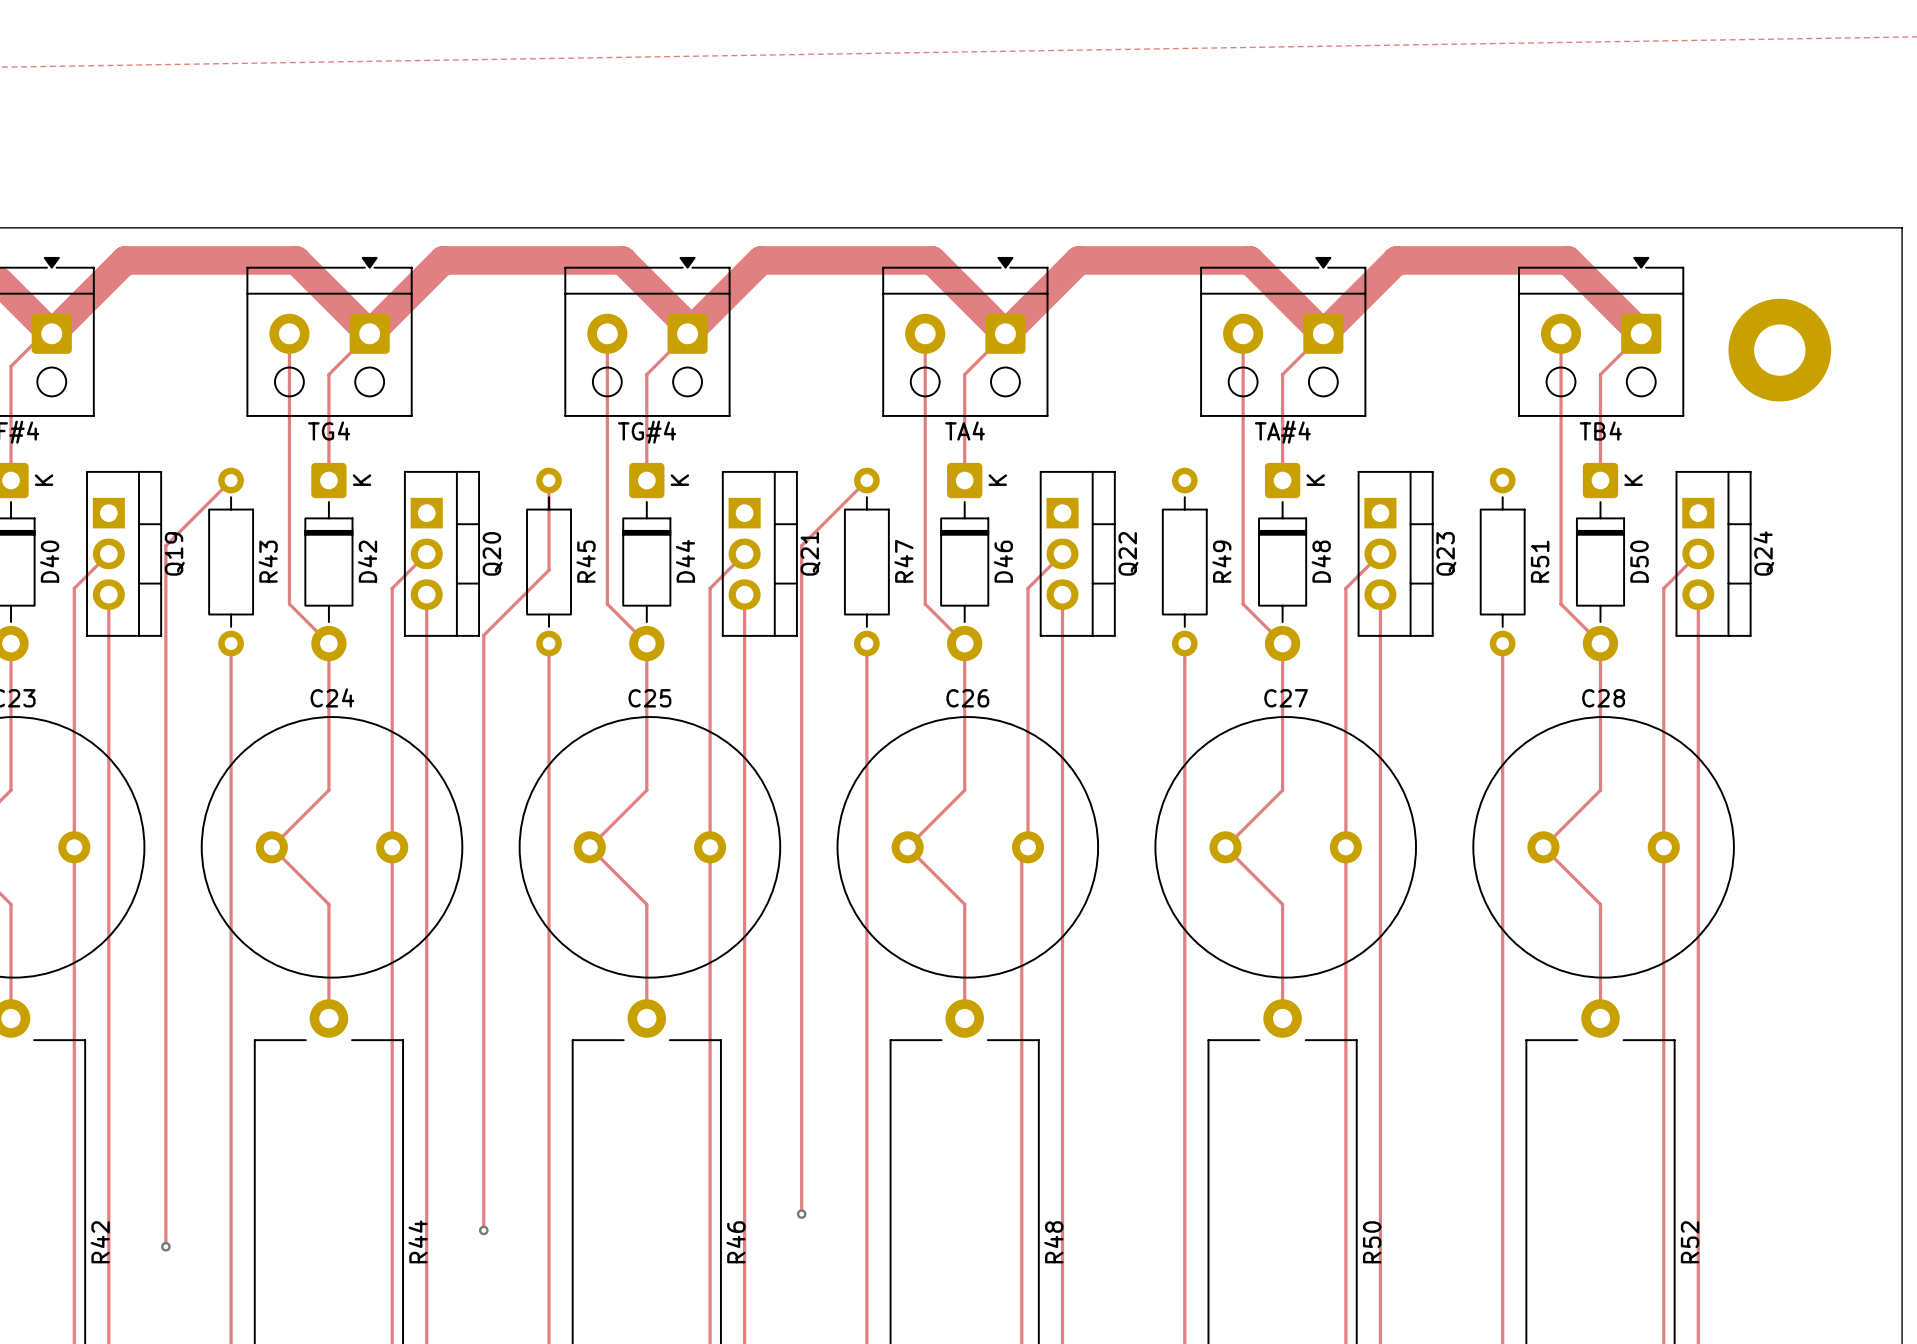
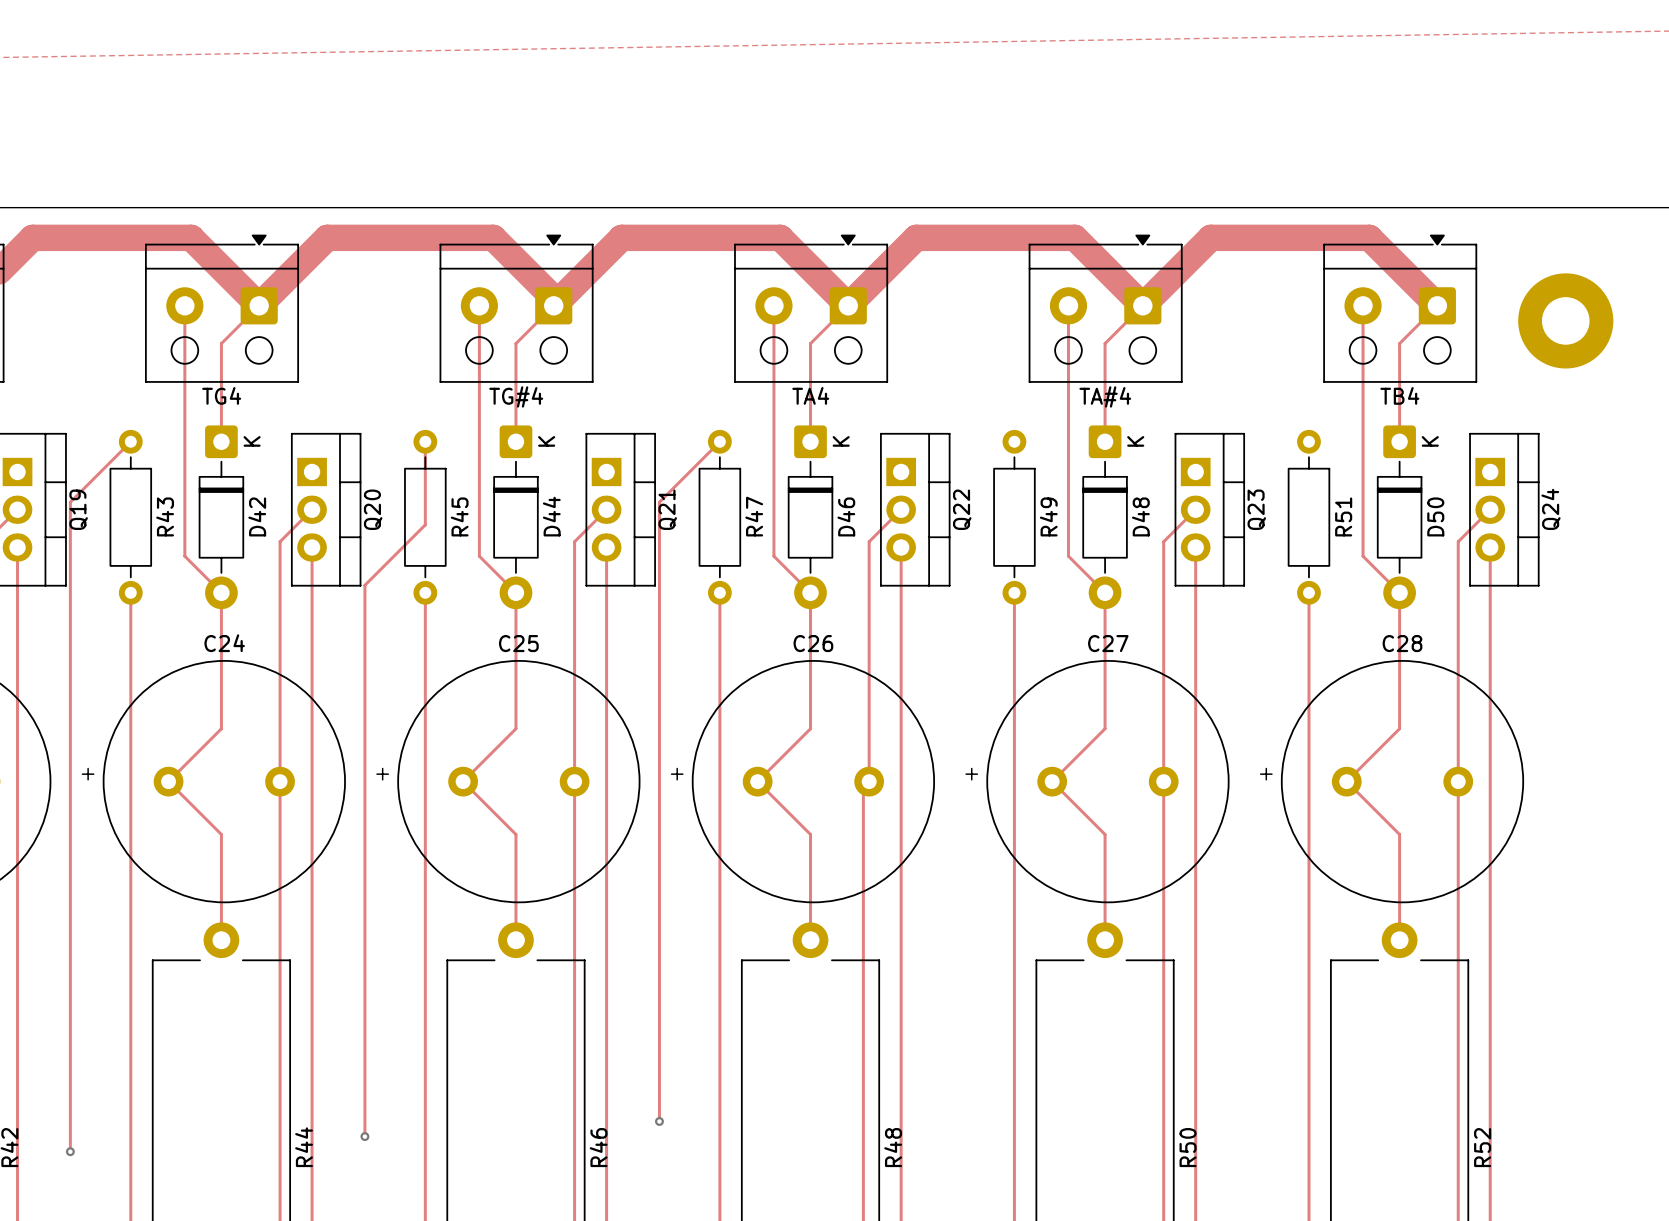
text: none -> + (88, 774)
text: none -> + (382, 774)
text: none -> + (677, 774)
text: none -> + (971, 774)
text: none -> + (1266, 774)

